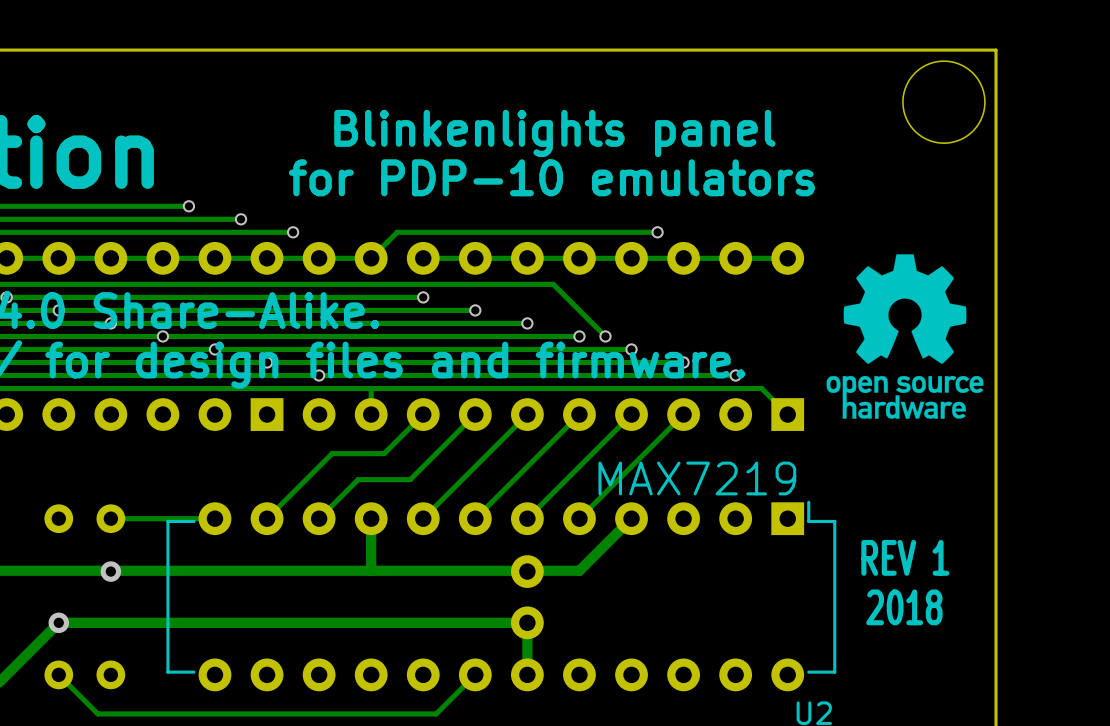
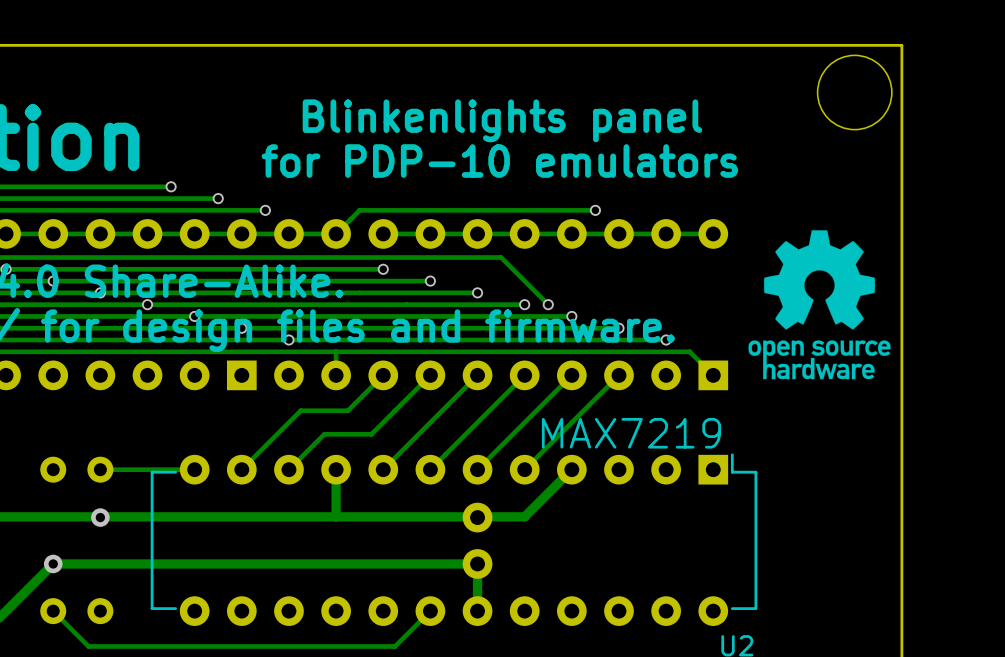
text: REV 1 (905, 557) -> none
text: 2018 (904, 607) -> none

